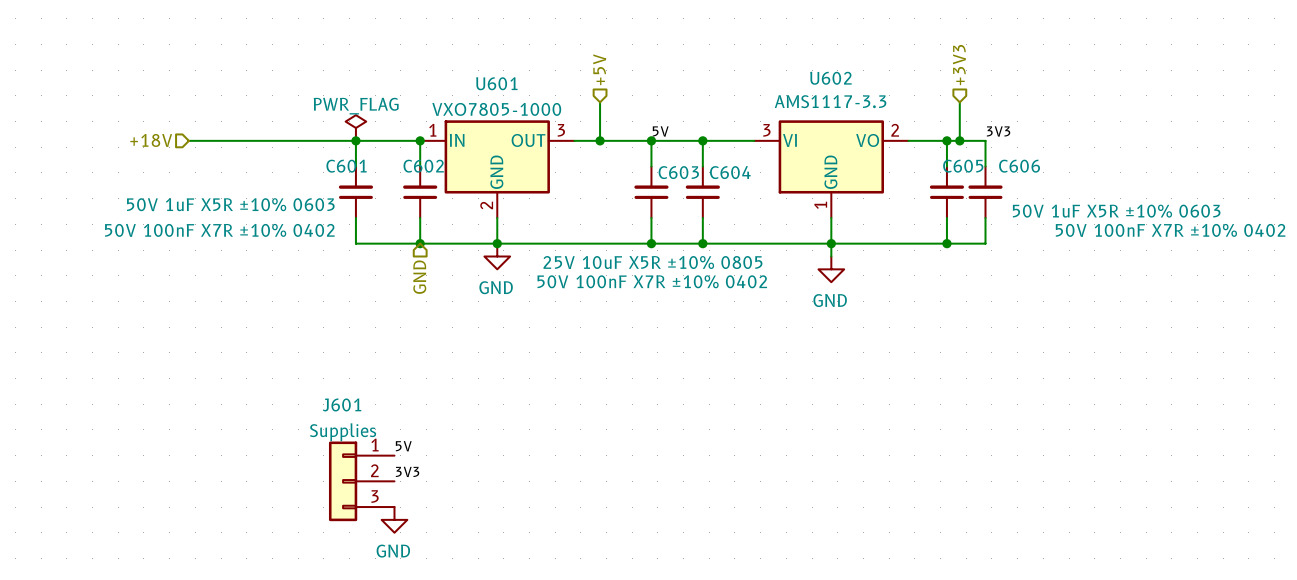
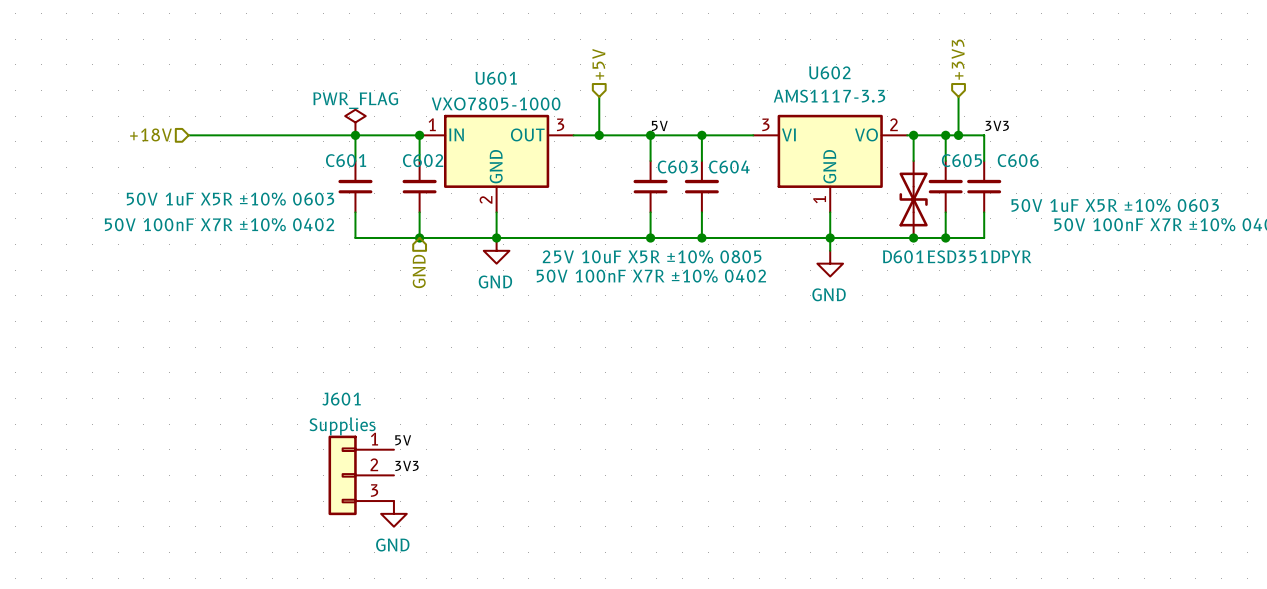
wire: none -> (913, 135) (913, 161)
junction: none -> (913, 135)
D601: none -> ESD351DPYR (913, 199)
junction: none -> (913, 237)

